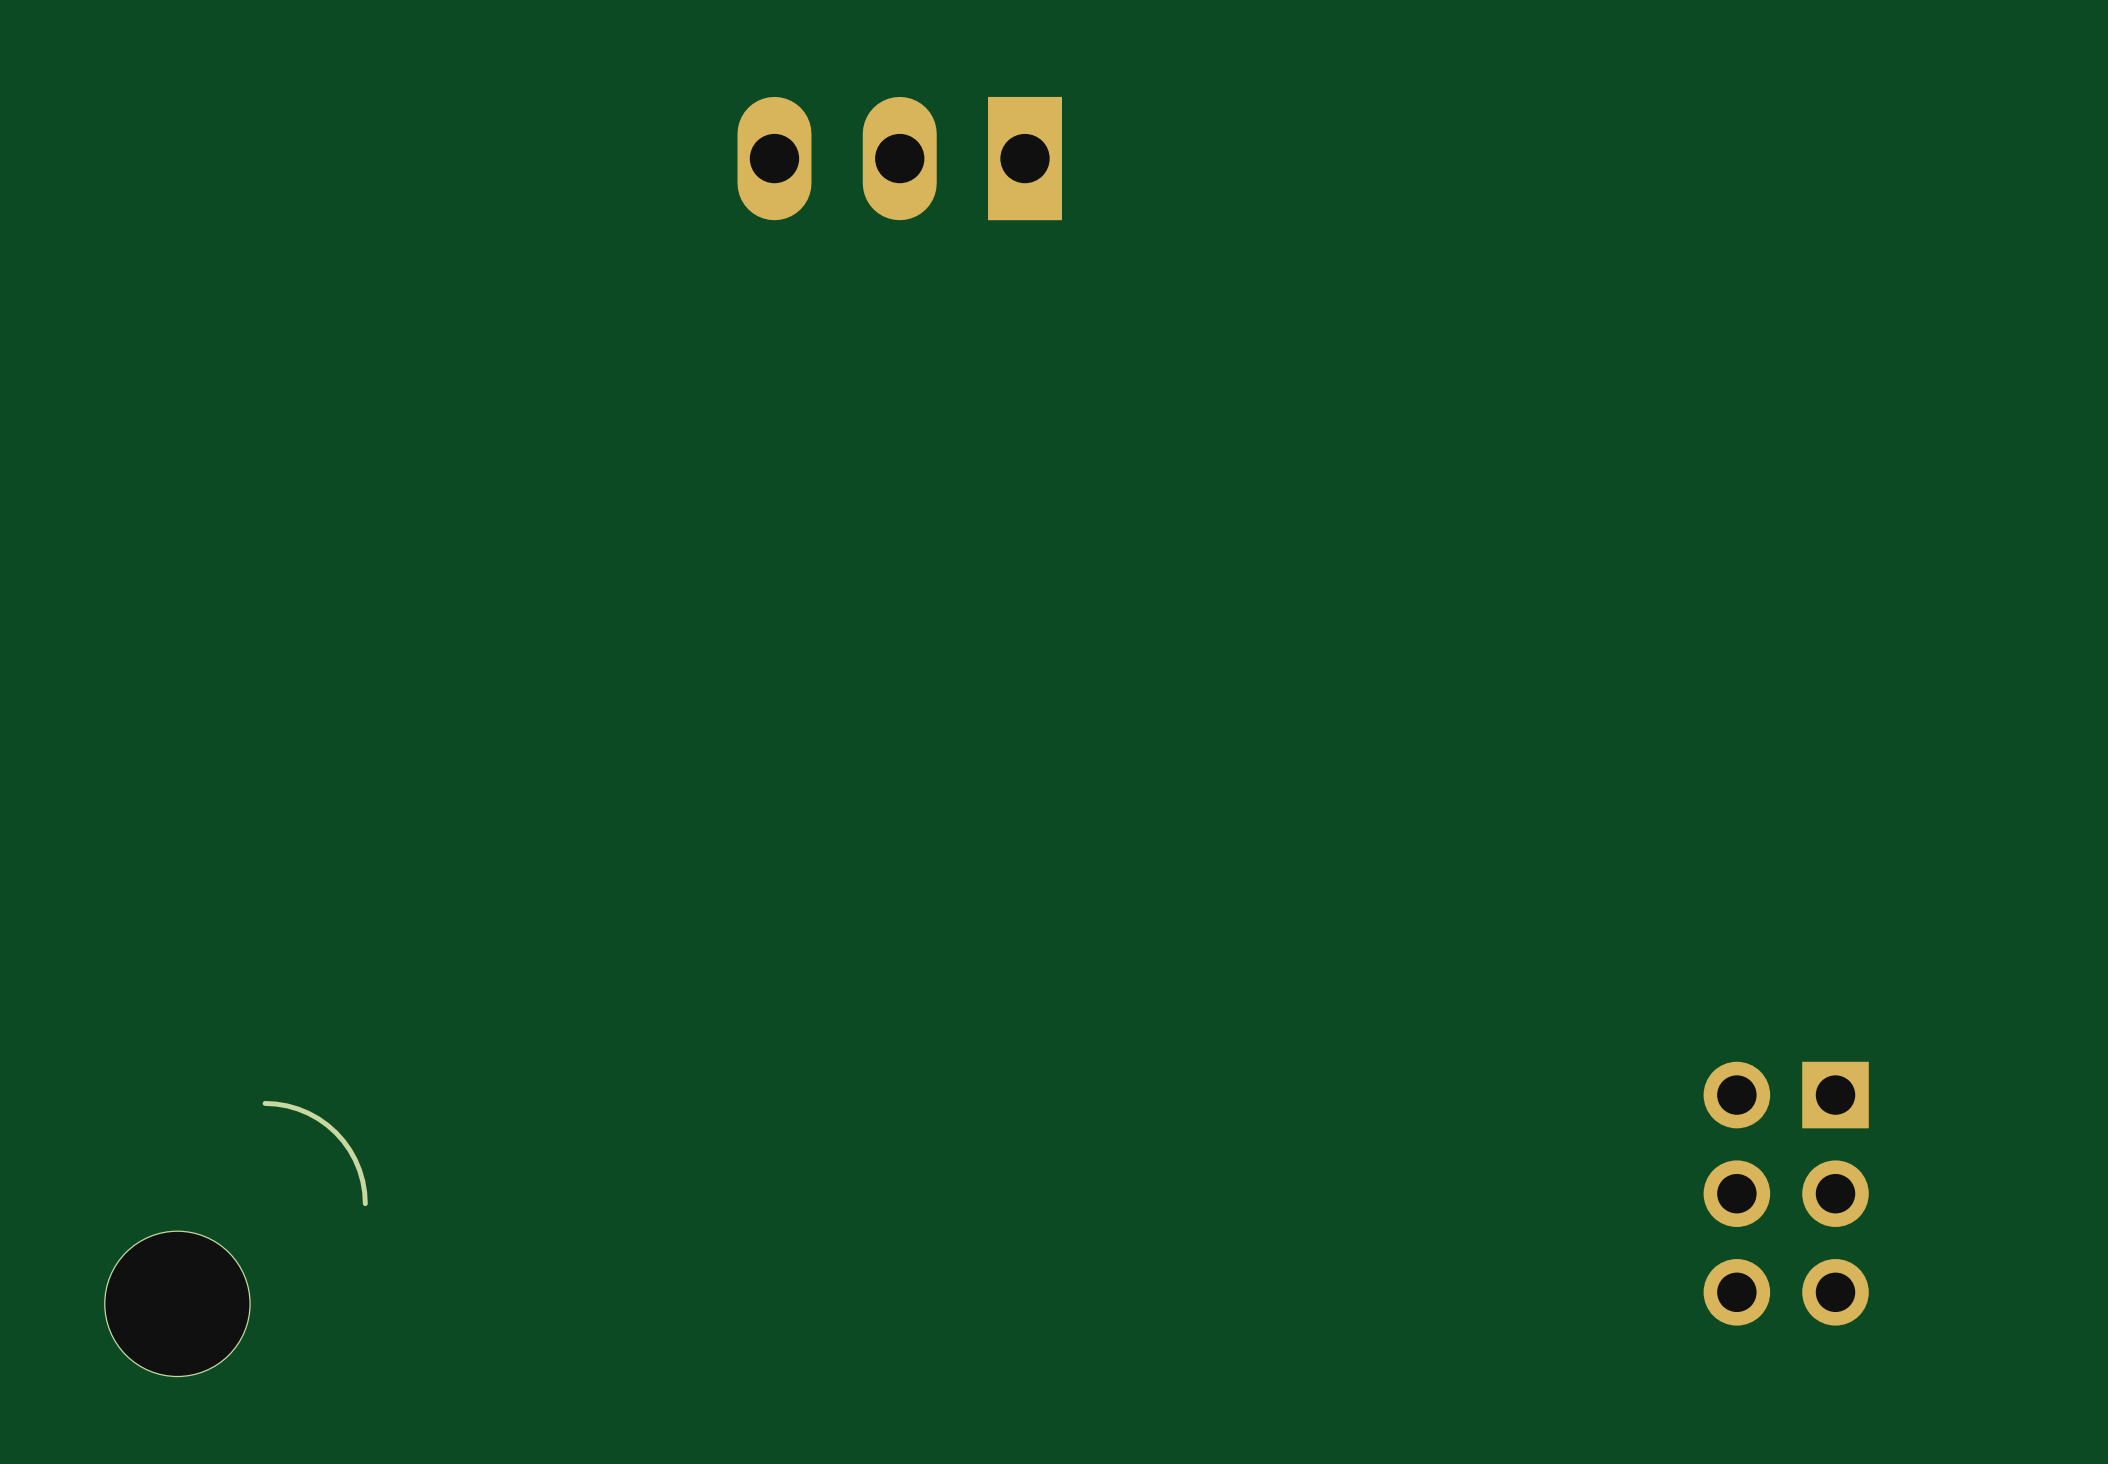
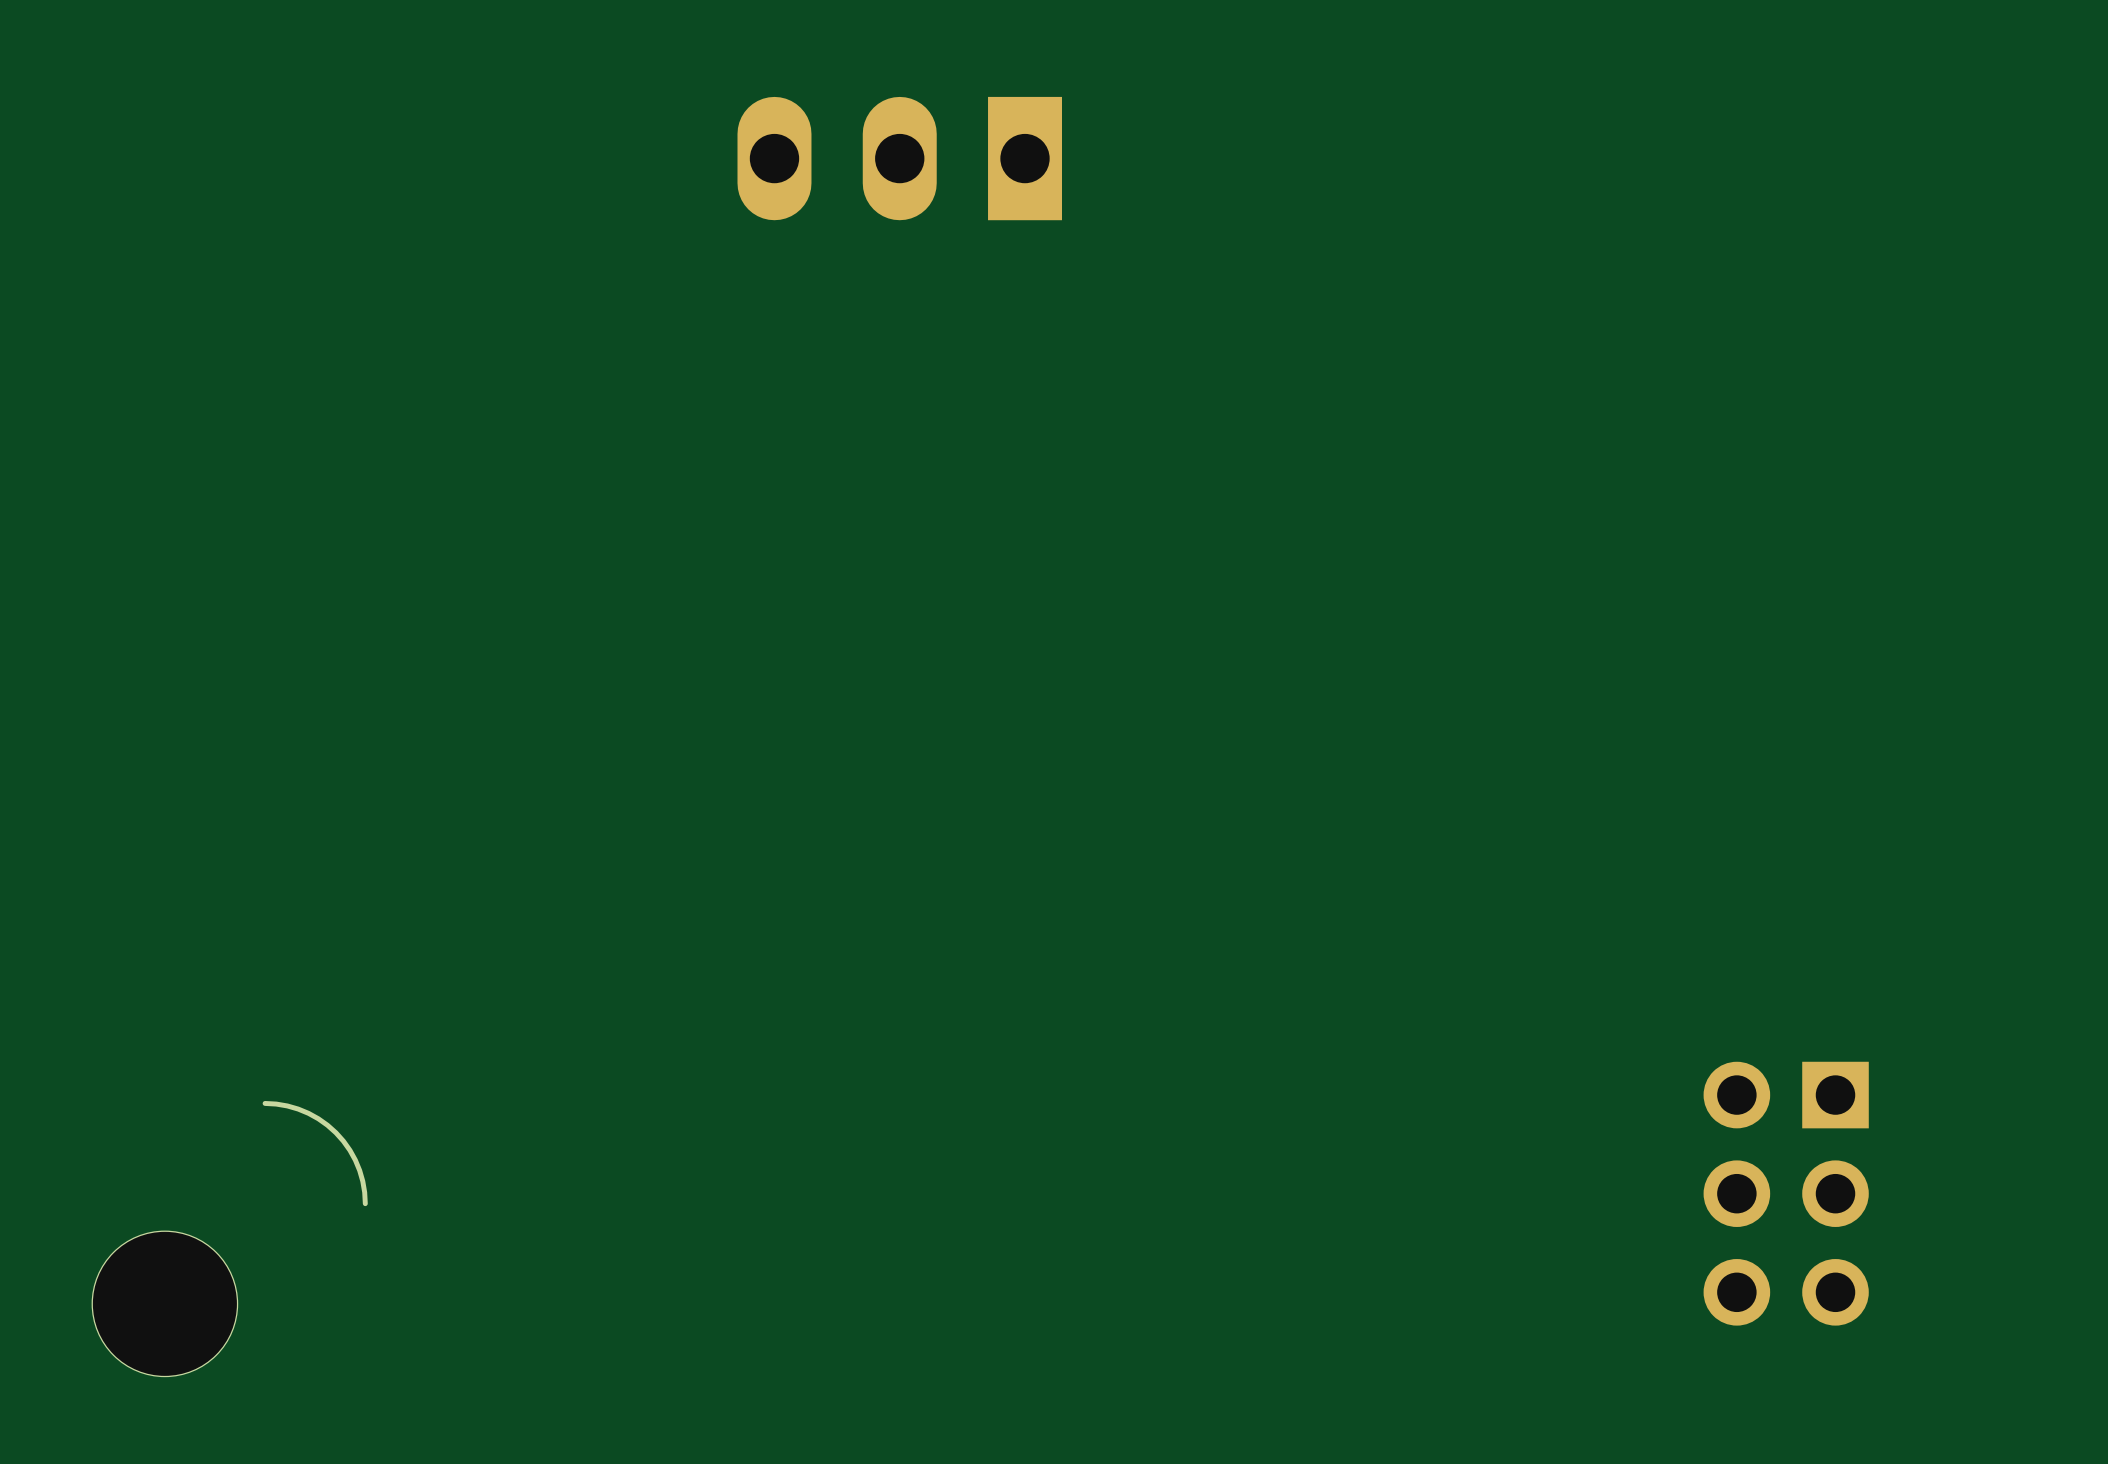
part position: (177, 1303) -> (164, 1303)

